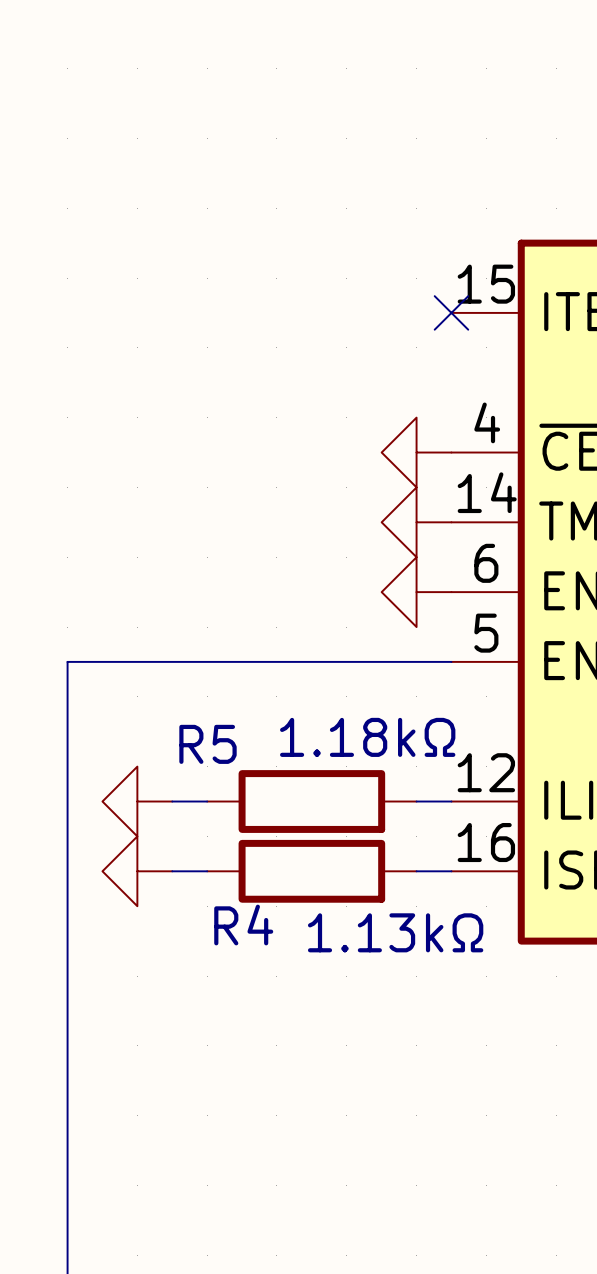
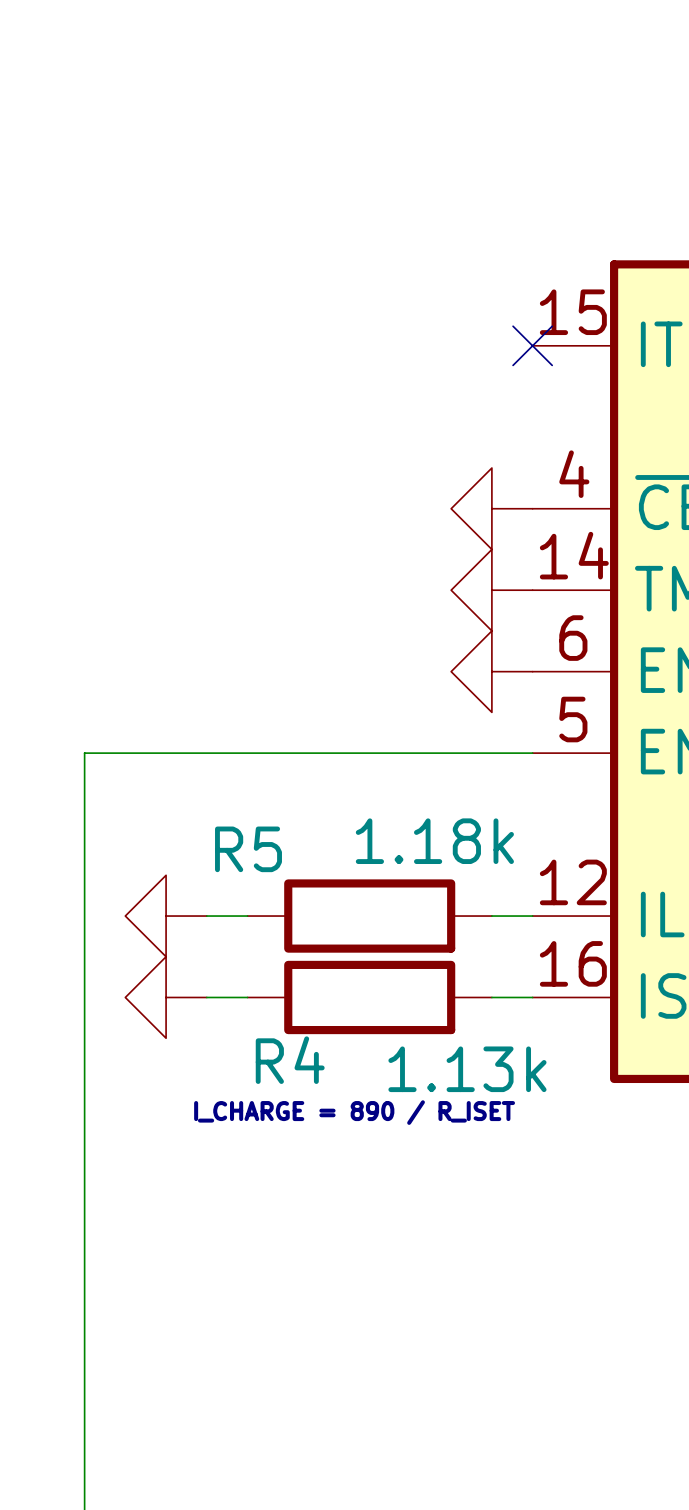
R5 value: 1.18kΩ (367, 737) -> 1.18k (434, 841)
R4 value: 1.13kΩ (395, 932) -> 1.13k (467, 1069)
text: none -> I_CHARGE = 890 / R_ISET (354, 1112)

